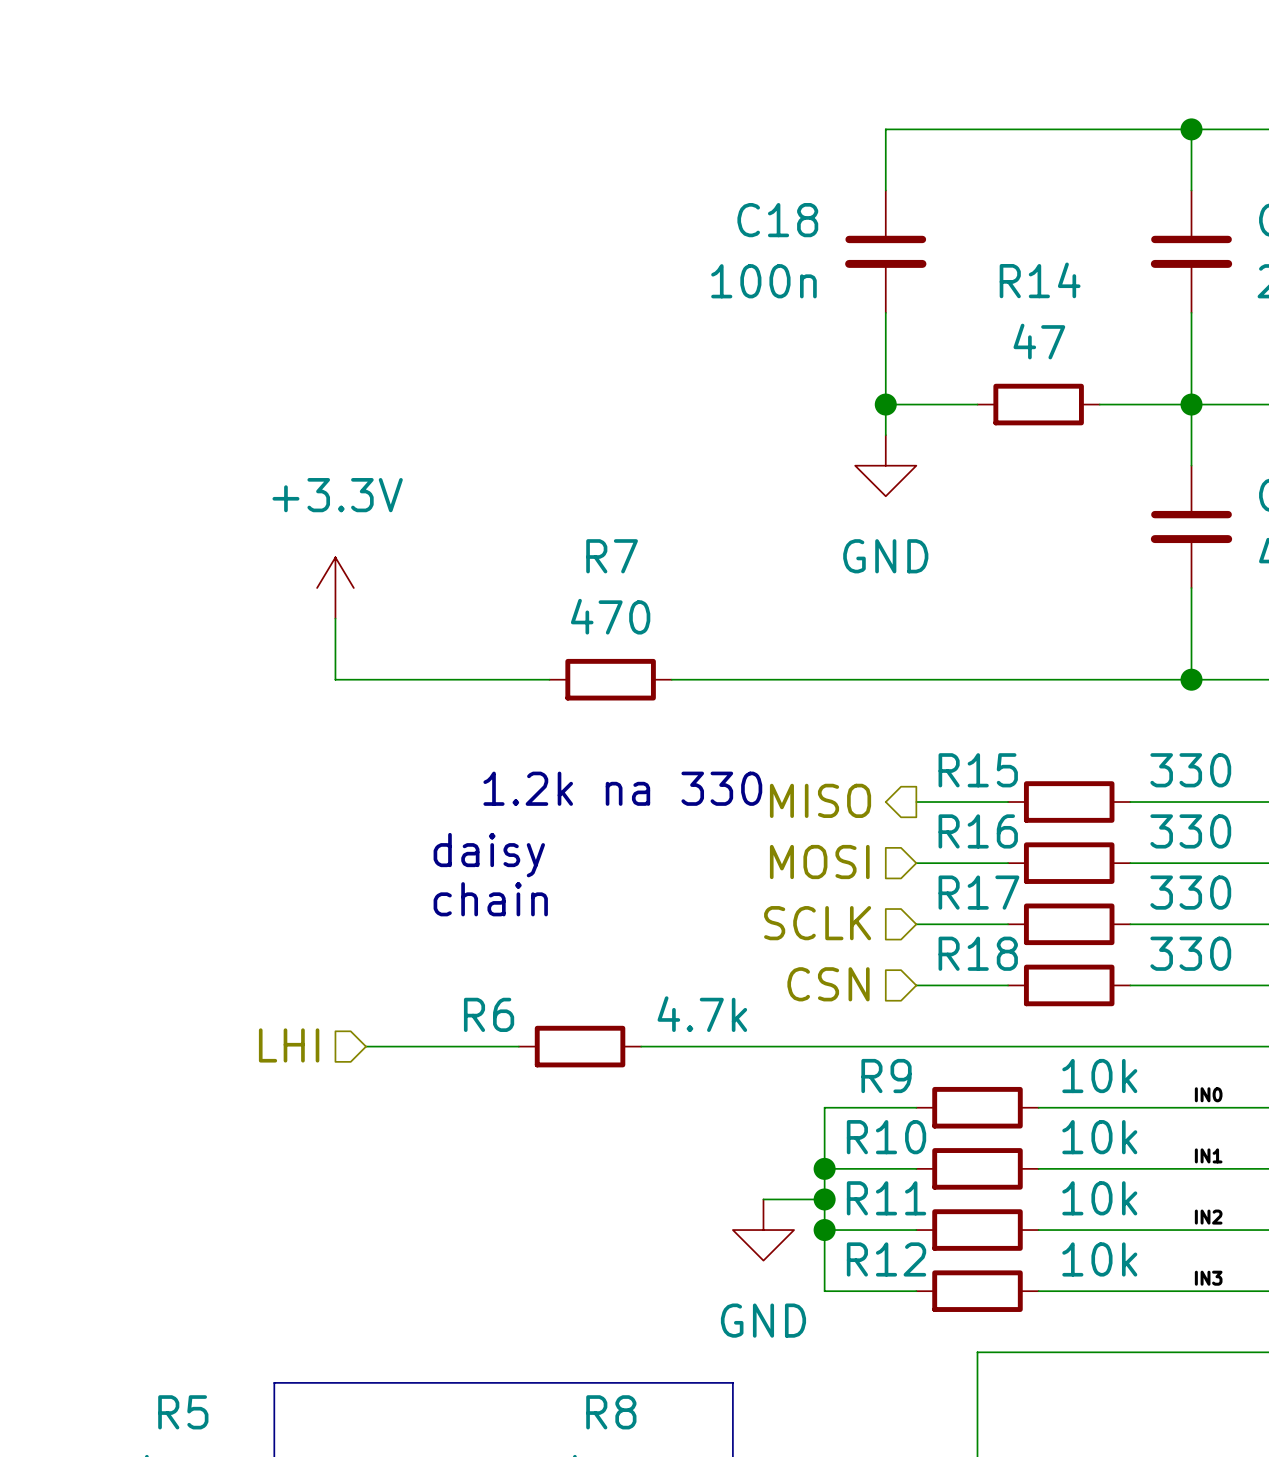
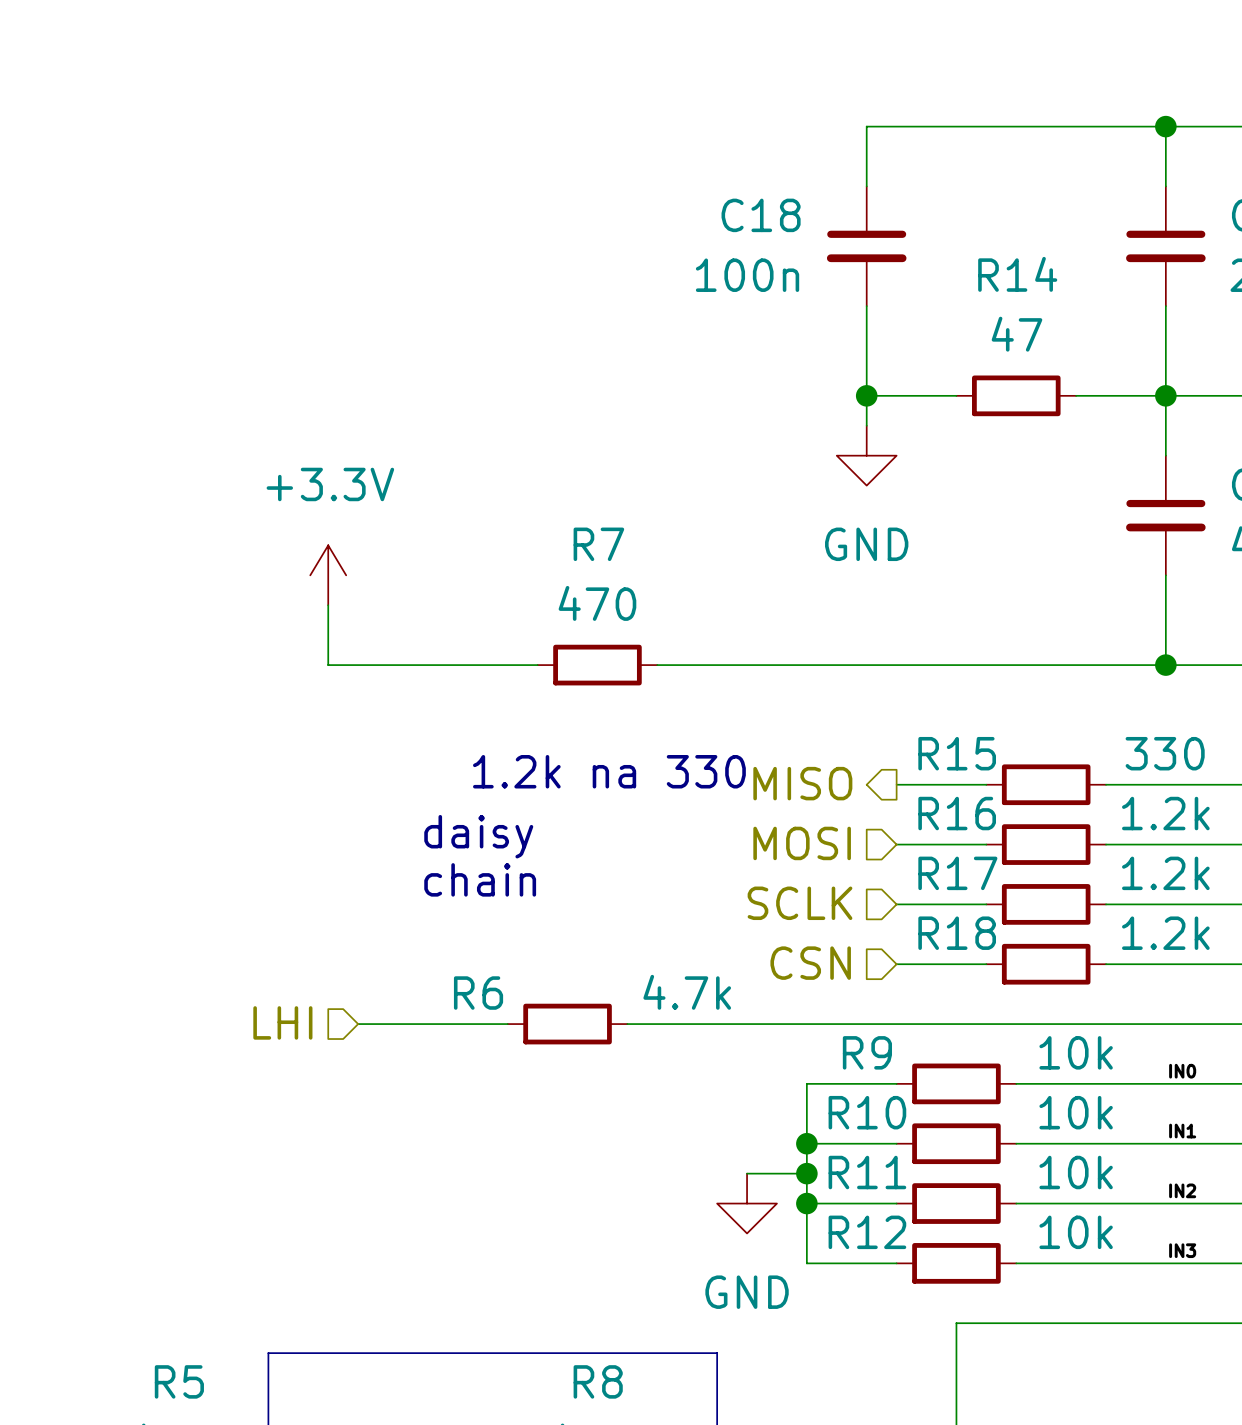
R16 value: 330 (1190, 831) -> 1.2k (1165, 813)
R17 value: 330 (1190, 892) -> 1.2k (1165, 873)
R18 value: 330 (1190, 953) -> 1.2k (1165, 933)

